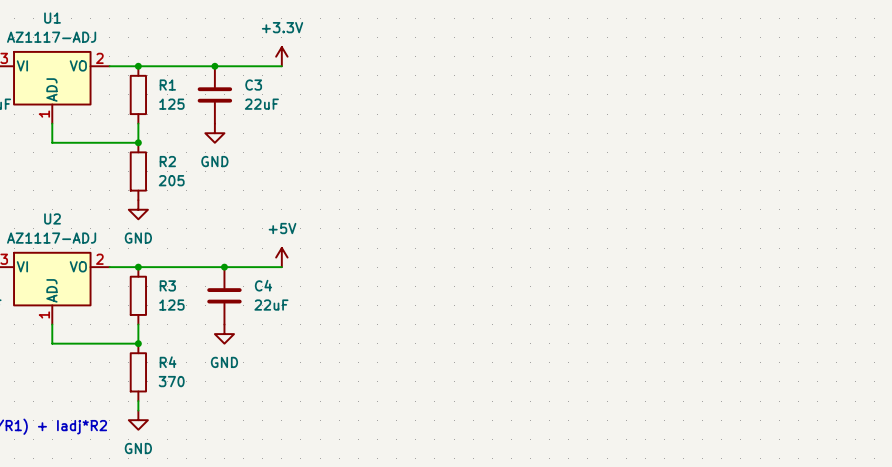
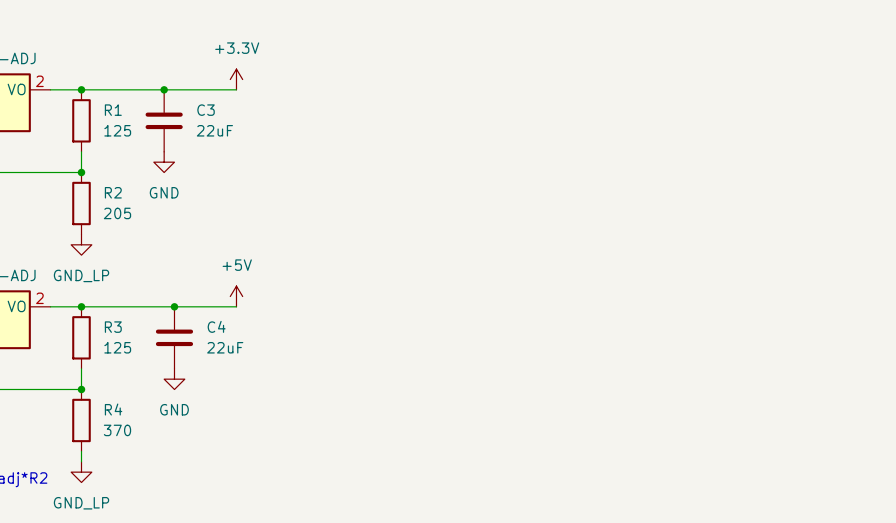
power symbol: GND (138, 209) -> GND_LP (81, 244)
power symbol: GND (138, 420) -> GND_LP (81, 472)

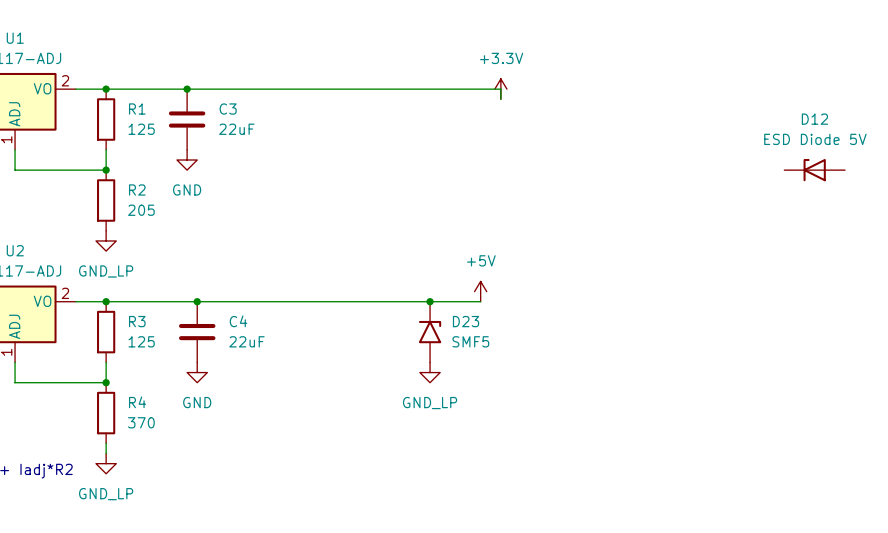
power symbol: +3.3V (236, 79) -> none
wire: none -> (257, 89) (500, 89) (500, 99)
power symbol: none -> +3.3V (500, 89)
D12: none -> ESD Diode 5V (814, 170)
power symbol: +5V (236, 296) -> none
power symbol: none -> +5V (480, 291)
wire: none -> (257, 301) (480, 301)
junction: none -> (430, 301)
D23: none -> SMF5 (430, 332)
power symbol: none -> GND_LP (430, 372)

